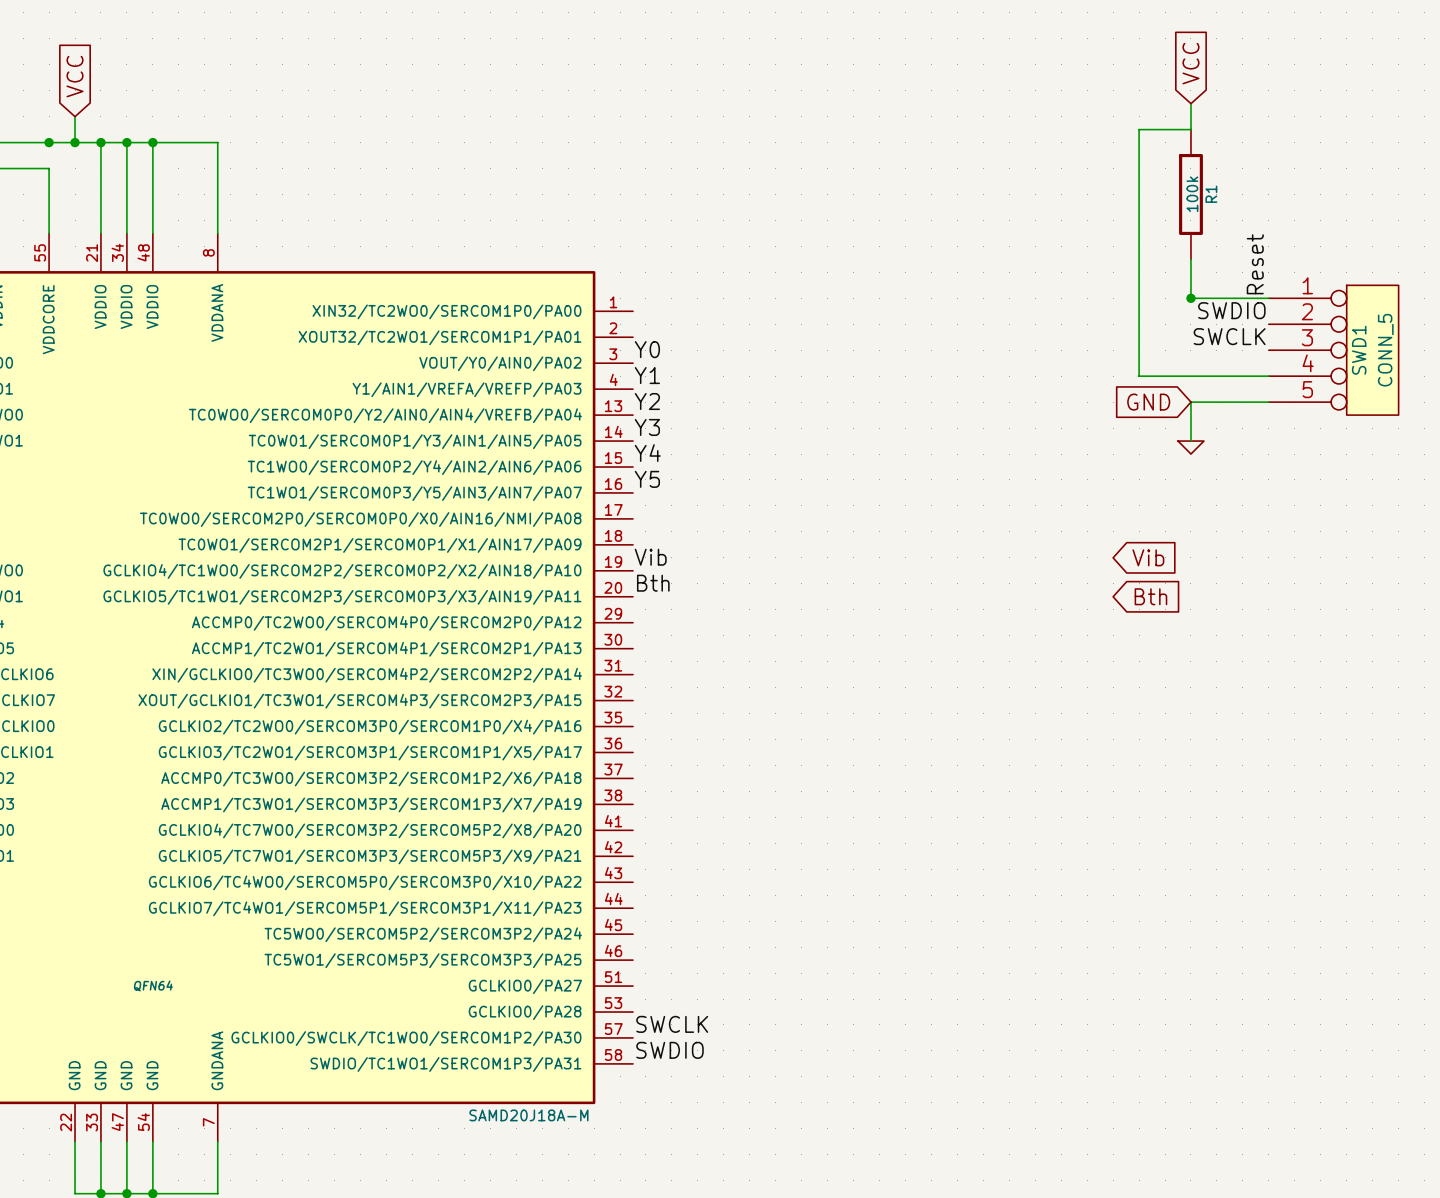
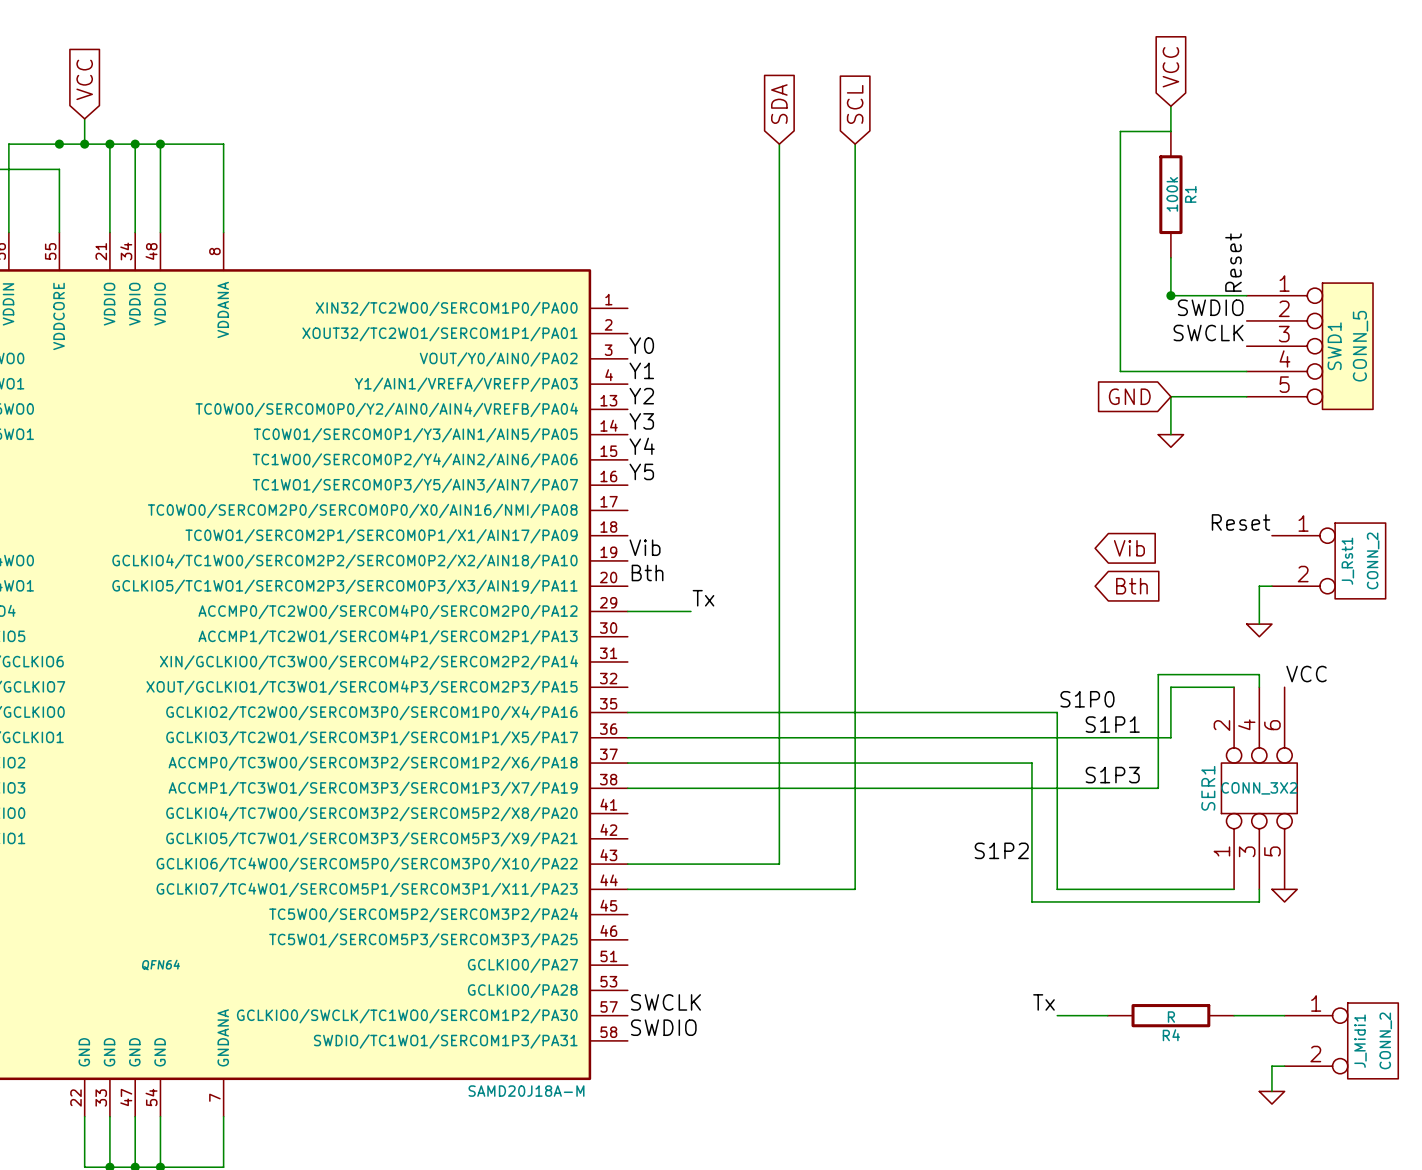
global label: none -> SDA (779, 104)
global label: none -> SCL (855, 104)
wire: none -> (779, 144) (779, 864) (627, 864)
wire: none -> (855, 144) (855, 889) (627, 889)
label: none -> Reset (1241, 522)
J_Rst1: none -> CONN_2 (1328, 560)
wire: none -> (1271, 586) (1259, 586) (1259, 624)
label: none -> Tx (703, 598)
wire: none -> (627, 611) (690, 611)
power symbol: none -> (1259, 630)
label: none -> VCC (1306, 674)
wire: none -> (1234, 687) (1170, 687) (1170, 737) (627, 737)
wire: none -> (1259, 687) (1259, 674) (1158, 674) (1158, 788) (627, 788)
label: none -> S1P0 (1087, 699)
wire: none -> (627, 712) (1057, 712) (1057, 889) (1234, 889)
label: none -> S1P1 (1112, 724)
wire: none -> (627, 763) (1031, 763) (1031, 901) (1259, 901) (1259, 889)
label: none -> S1P3 (1112, 775)
SER1: none -> CONN_3X2 (1259, 788)
label: none -> S1P2 (1001, 850)
power symbol: none -> (1284, 895)
label: none -> Tx (1043, 1002)
wire: none -> (1057, 1015) (1107, 1015)
R4: none -> R (1170, 1015)
wire: none -> (1234, 1015) (1284, 1015)
J_Midi1: none -> CONN_2 (1341, 1040)
wire: none -> (1284, 1066) (1271, 1066) (1271, 1091)
power symbol: none -> (1271, 1097)

